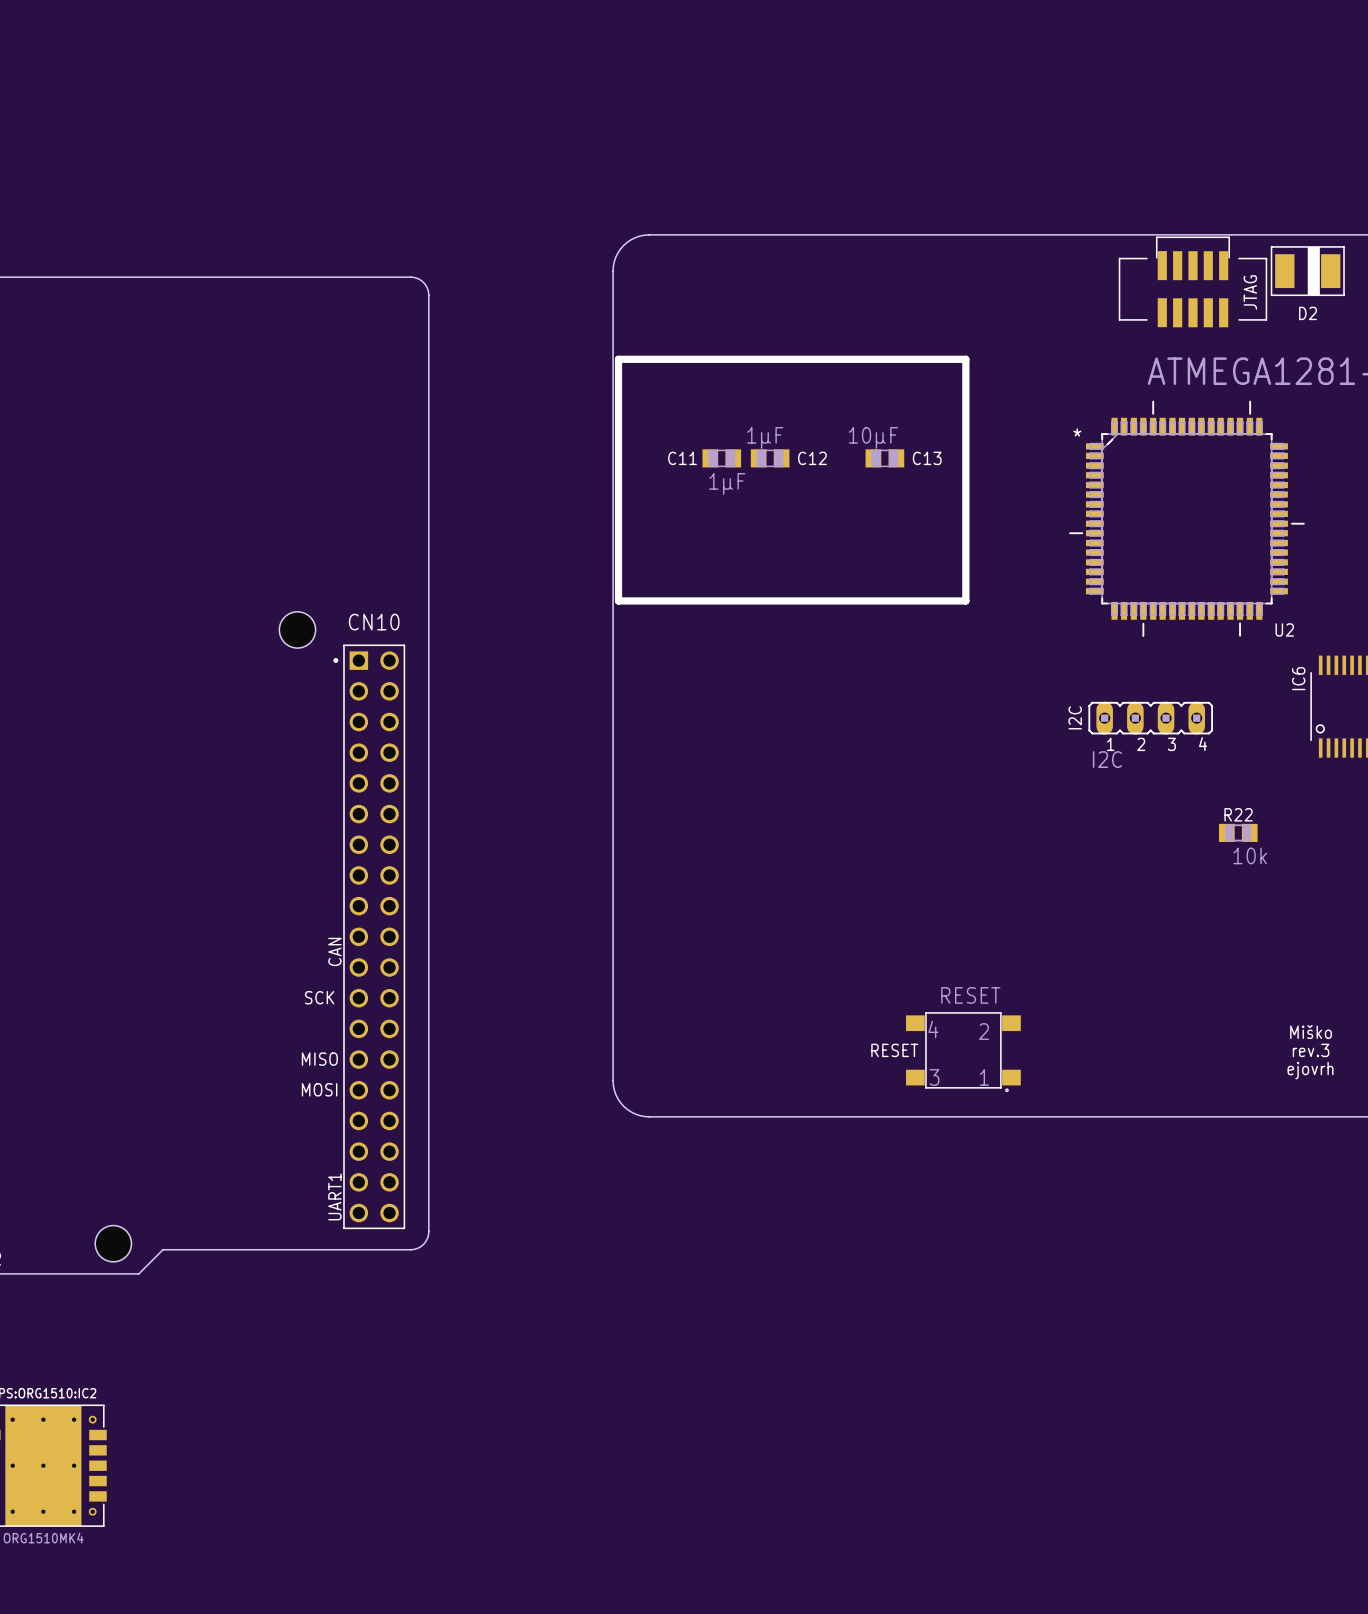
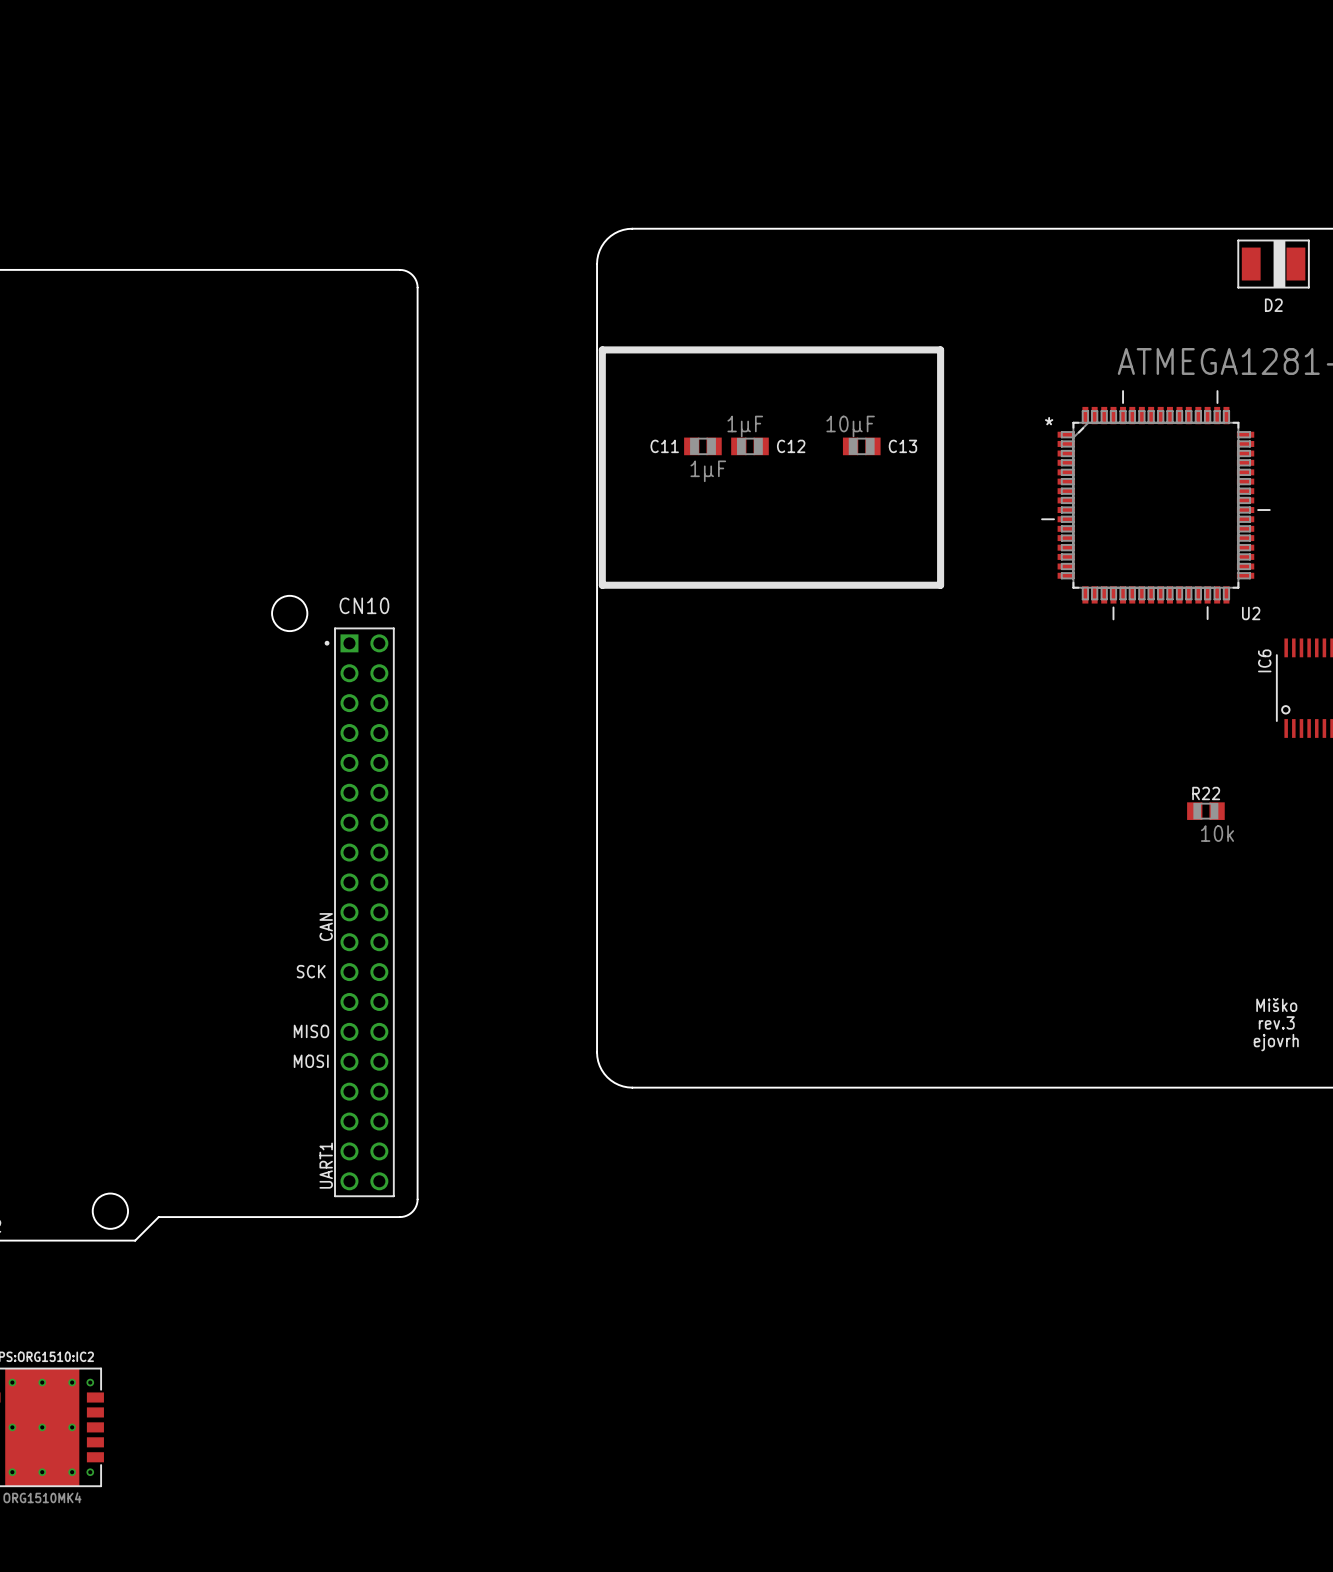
part: (1192, 281) -> none
text: JTAG (1250, 292) -> none
text: I2C (1075, 717) -> none
part: I2C (1150, 718) -> none
text: RESET (894, 1050) -> none
part: RESET (963, 1052) -> none

